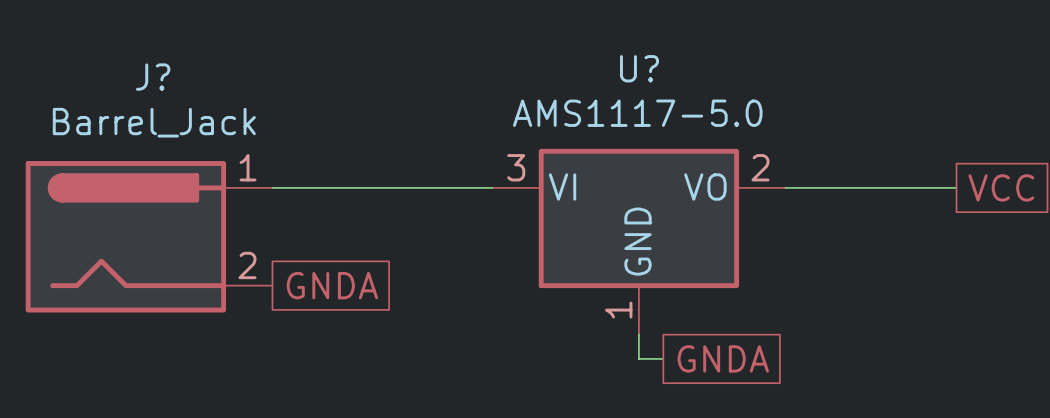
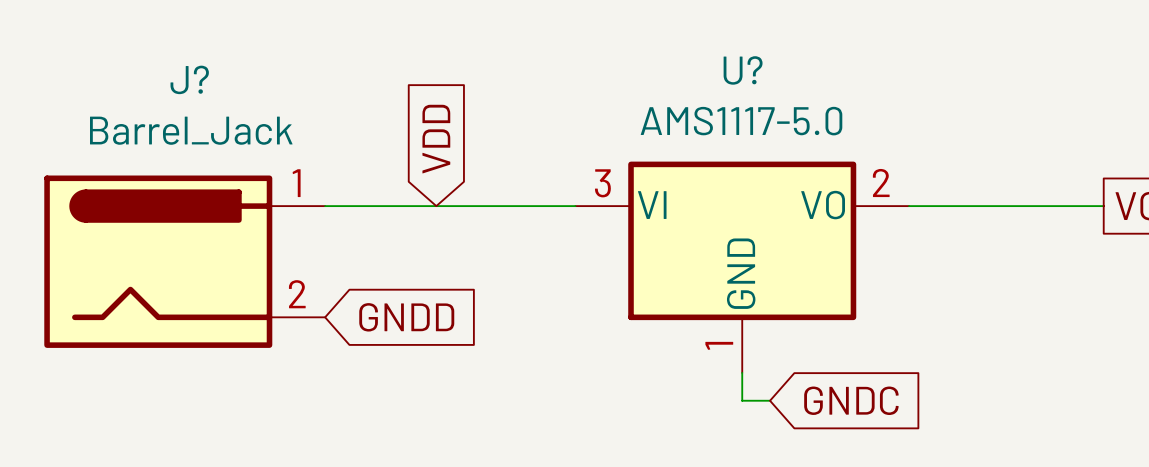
global label: none -> VDD (436, 139)
global label shape: passive (332, 285) -> input (406, 317)
global label: GNDA (332, 285) -> GNDD (406, 317)
global label shape: passive (723, 358) -> input (851, 400)
global label: GNDA (723, 358) -> GNDC (851, 400)

